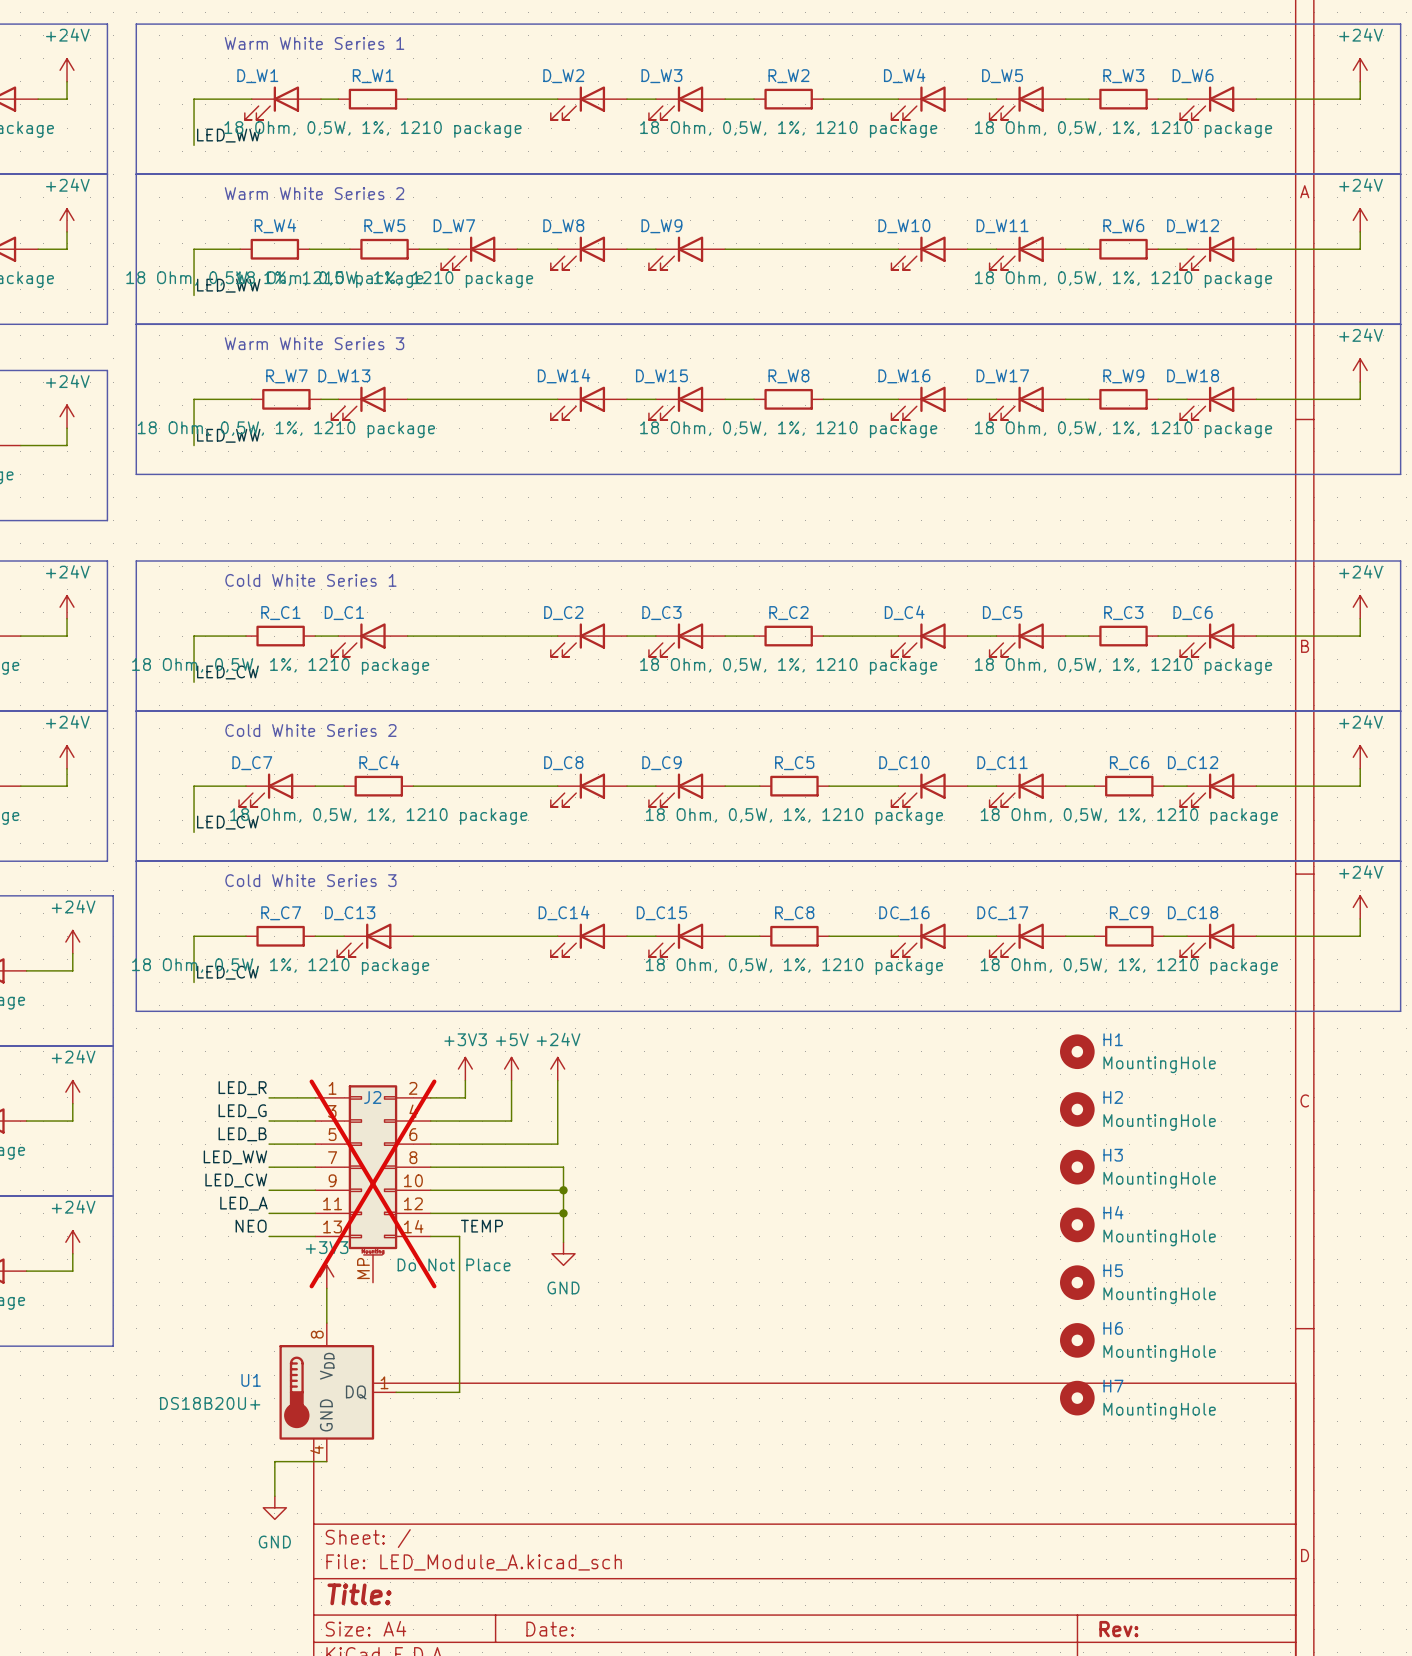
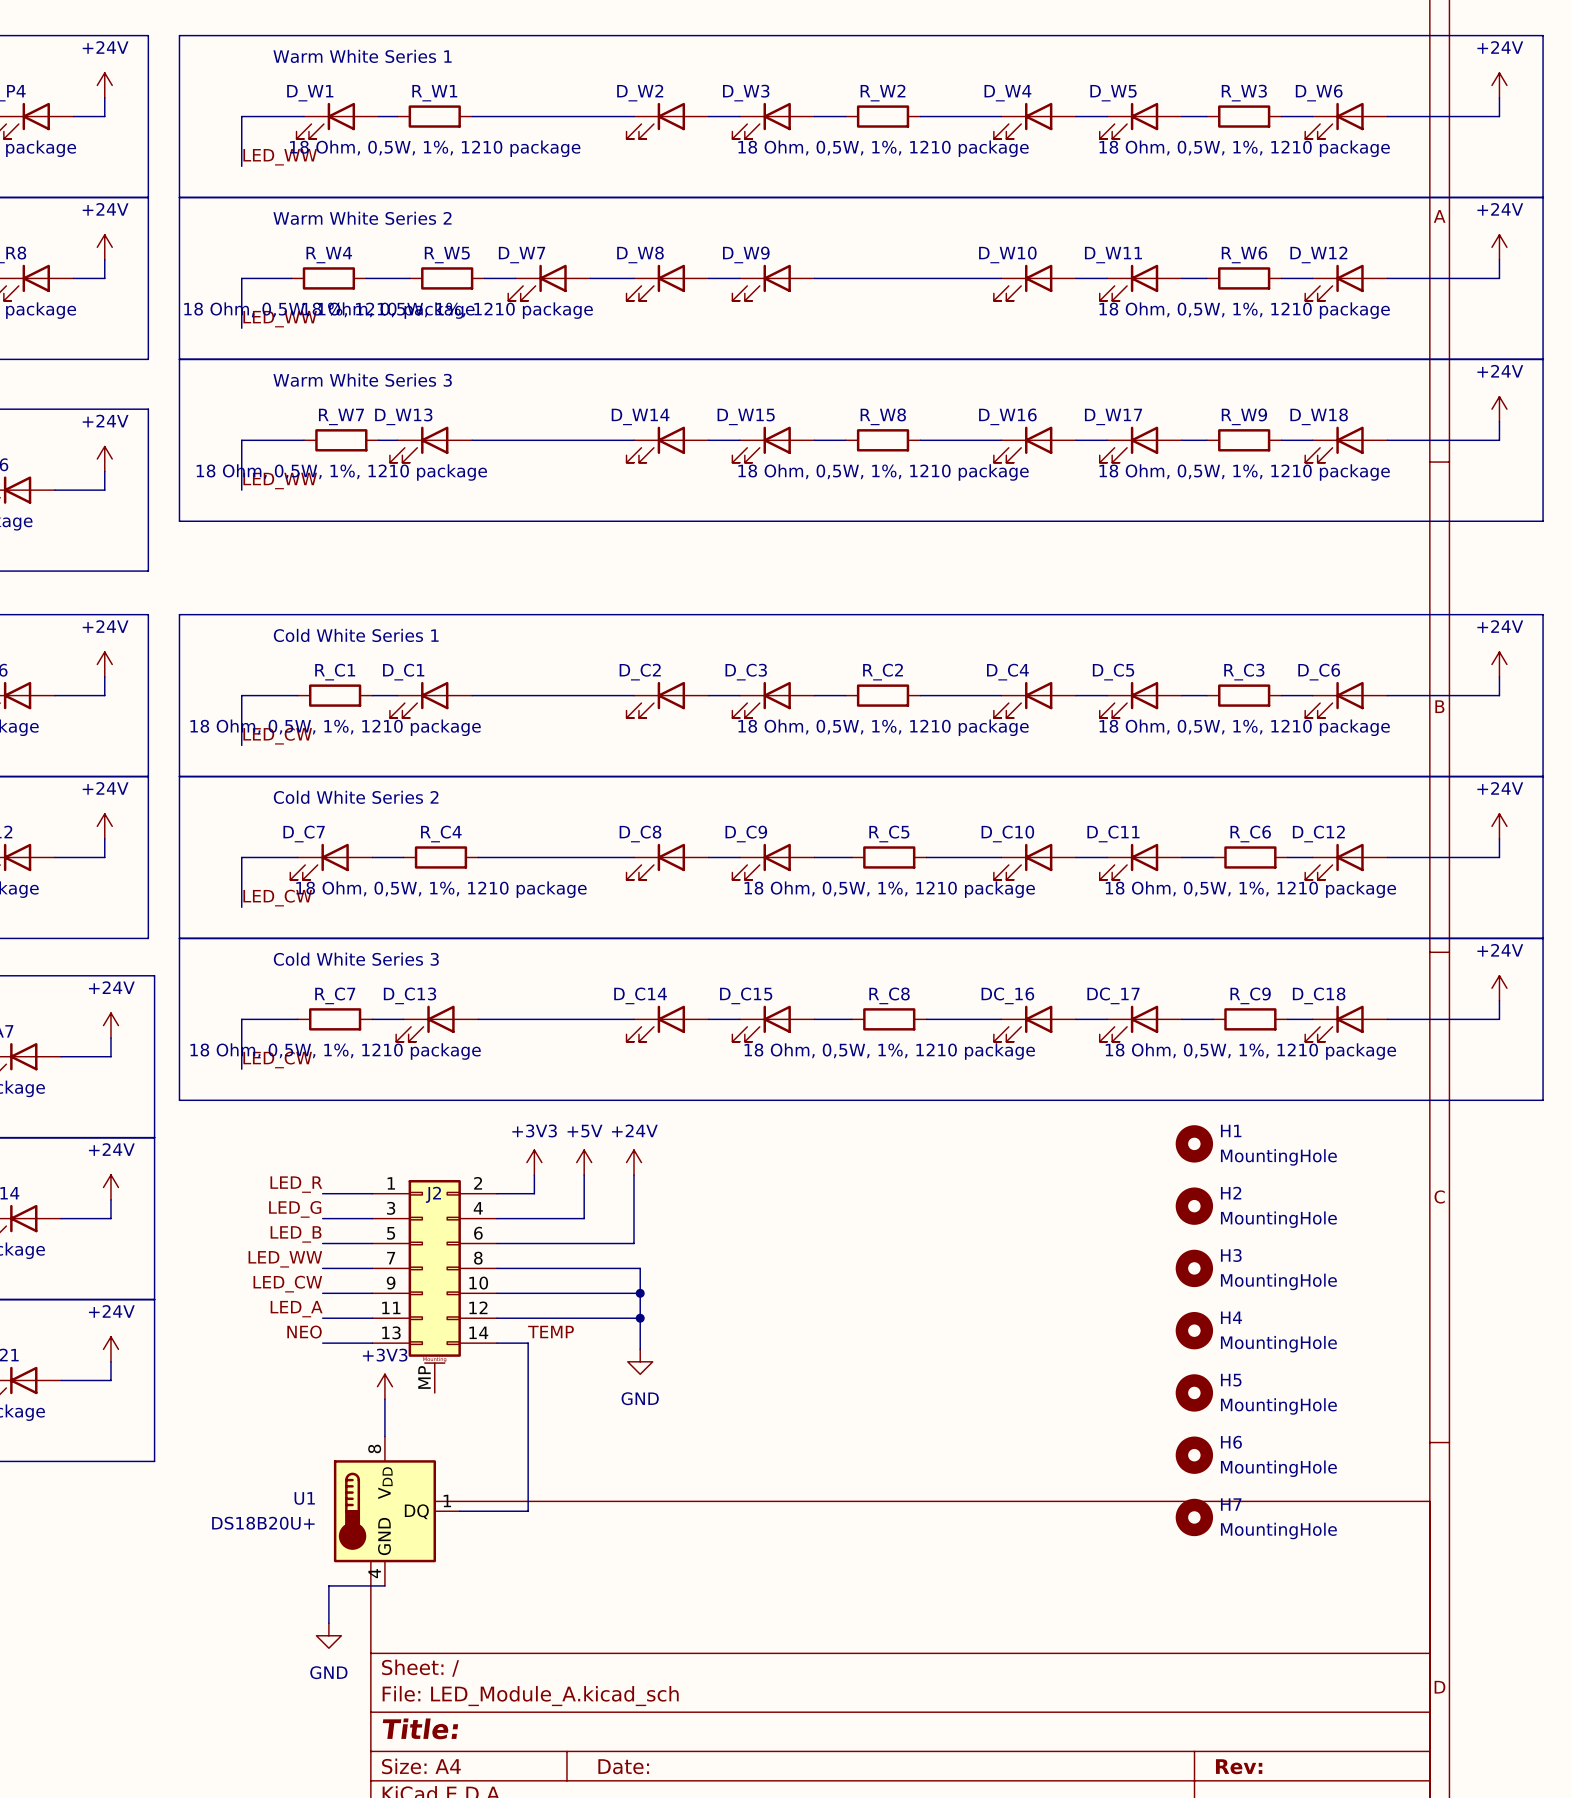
J2 do-not-place cross: (372, 1183) -> none
J2 value: Do Not Place (454, 1264) -> none

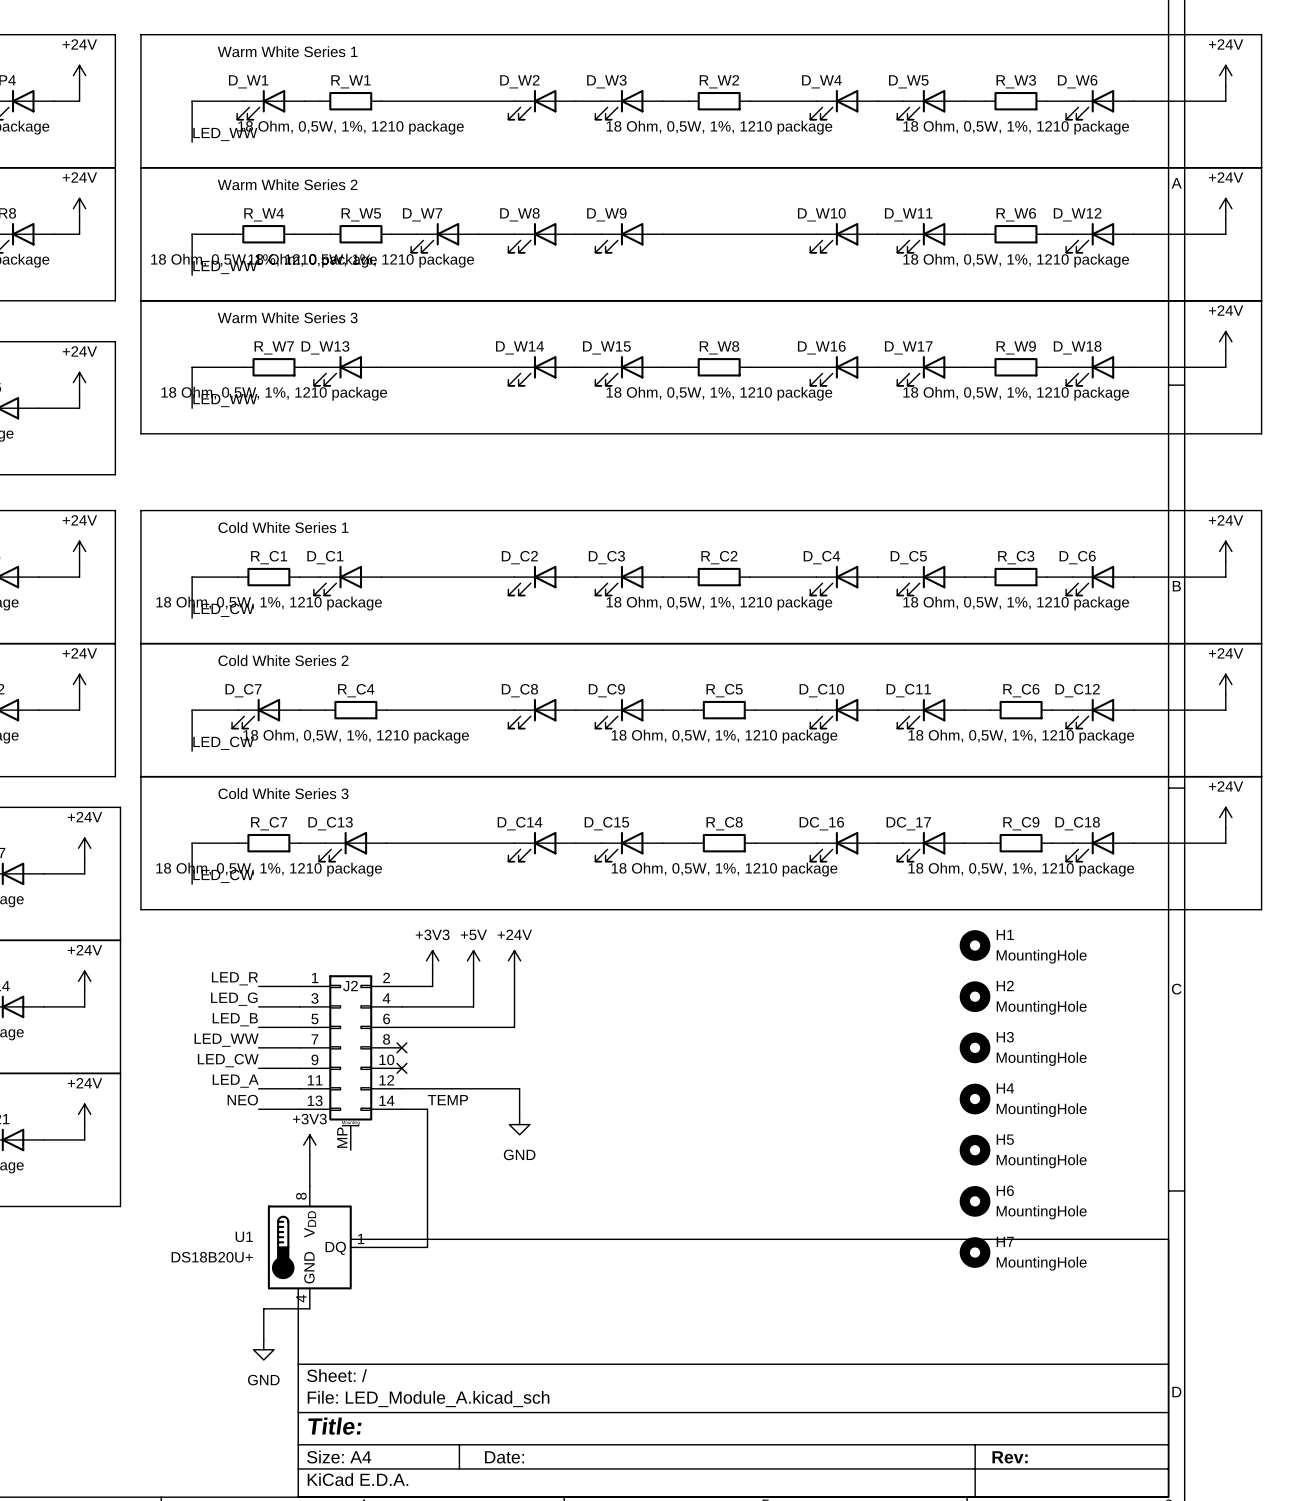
wire: (497, 1268) (640, 1268) (640, 1318) -> none
no-connect mark: none -> (401, 1047)
wire: (497, 1293) (640, 1293) -> none
no-connect mark: none -> (401, 1068)
junction: (640, 1293) -> none
junction: (640, 1318) -> none

